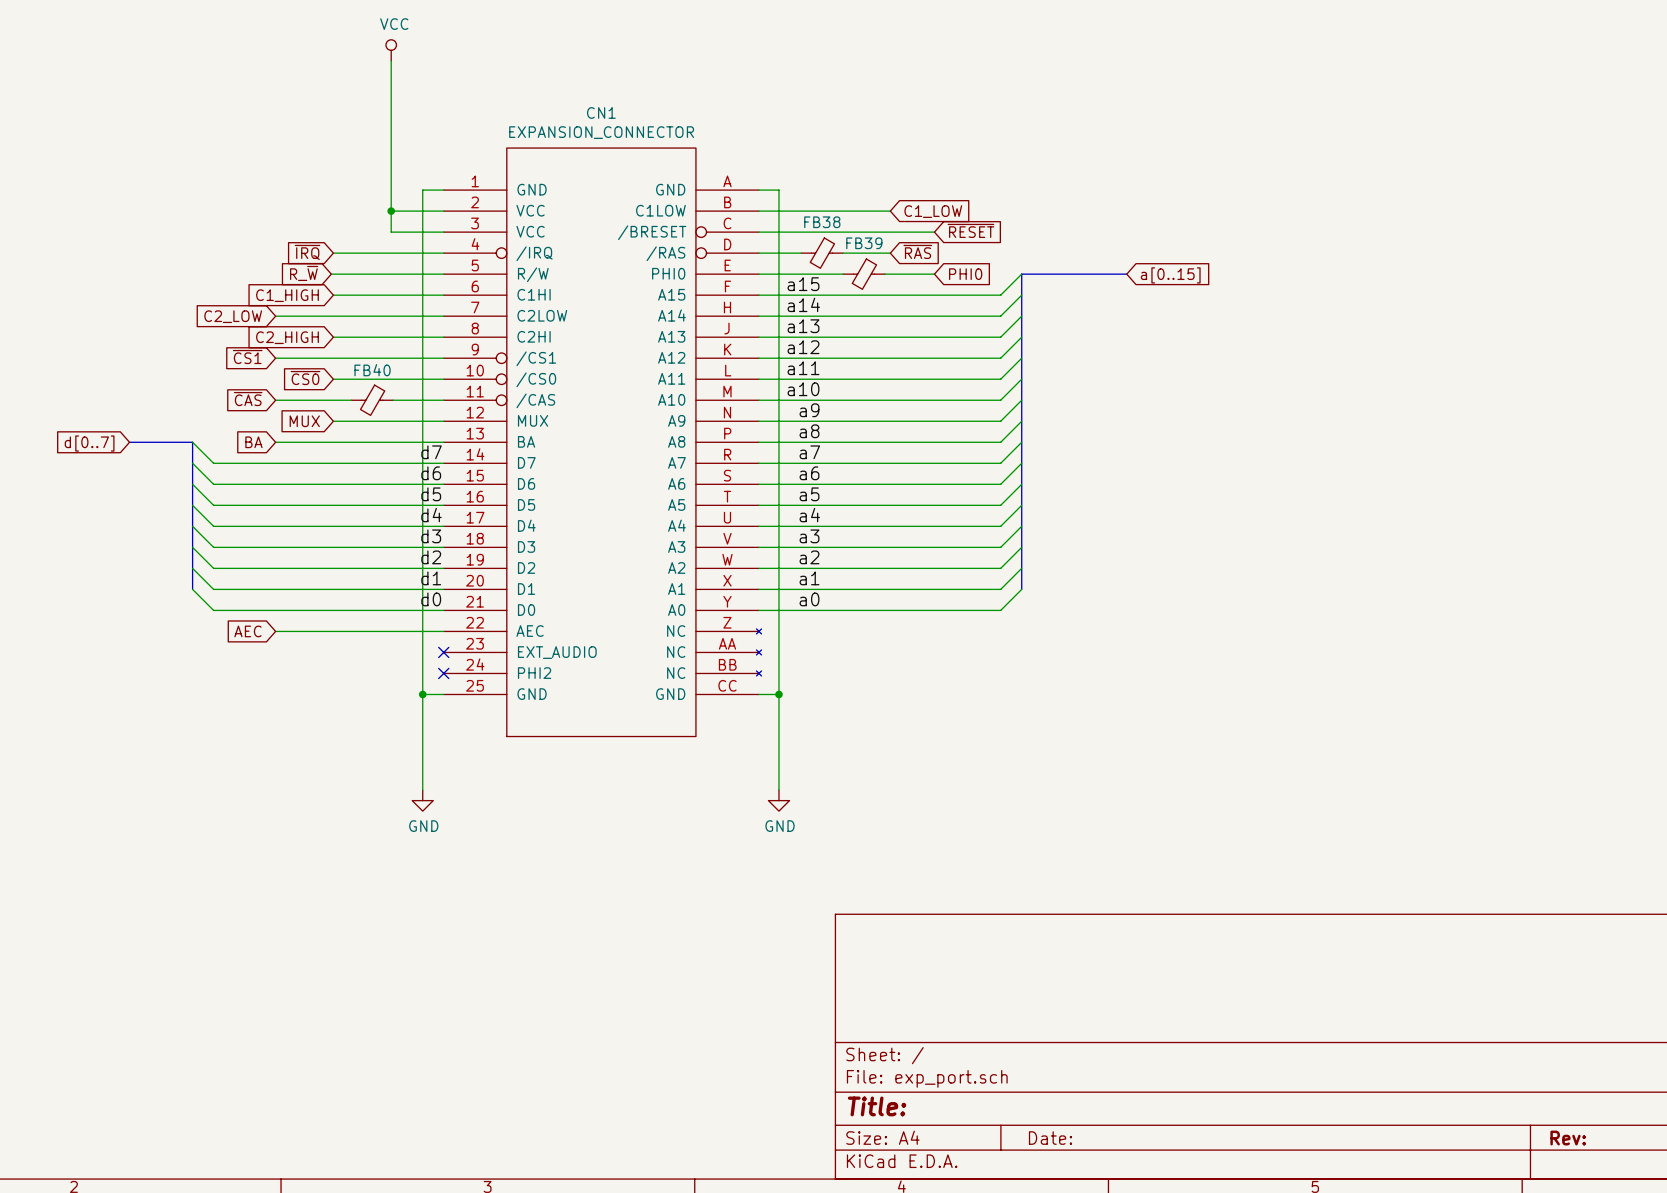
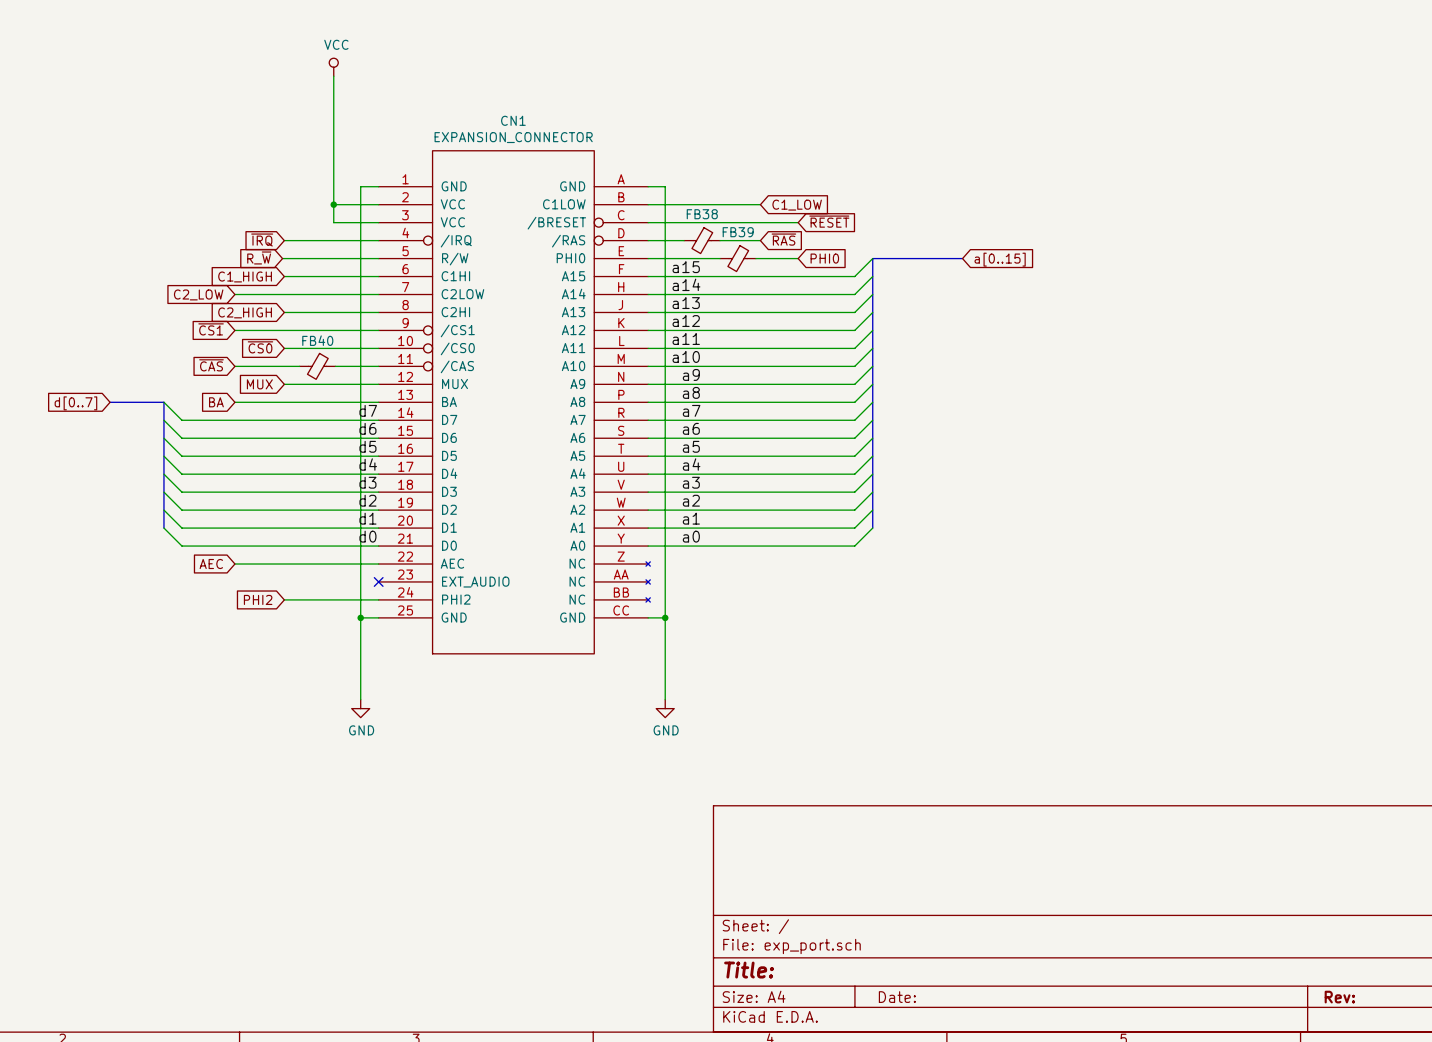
global label: none -> PHI2 (258, 599)
wire: none -> (284, 599) (378, 599)
no-connect mark: (443, 673) -> none

